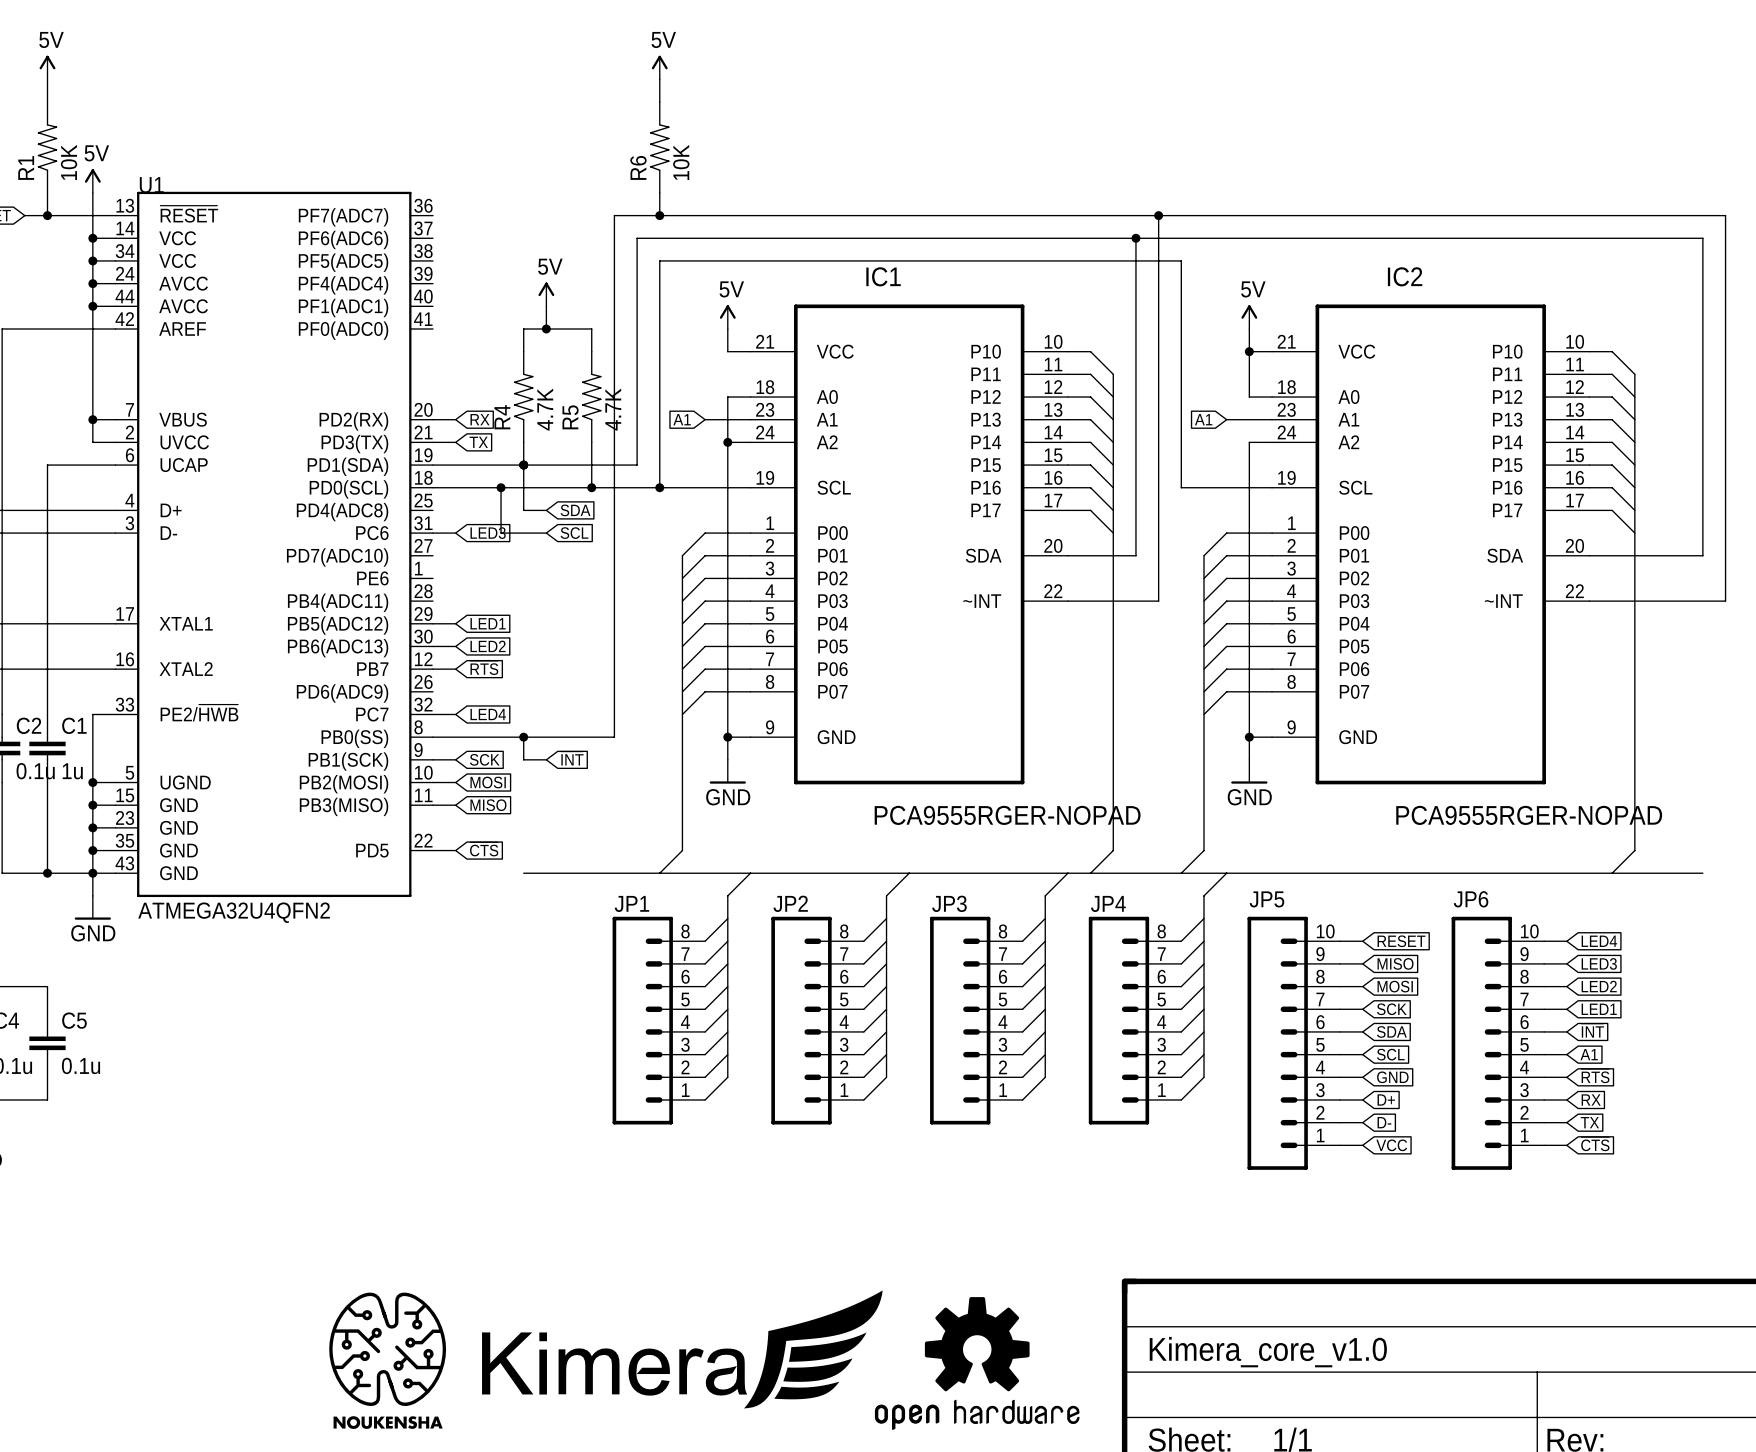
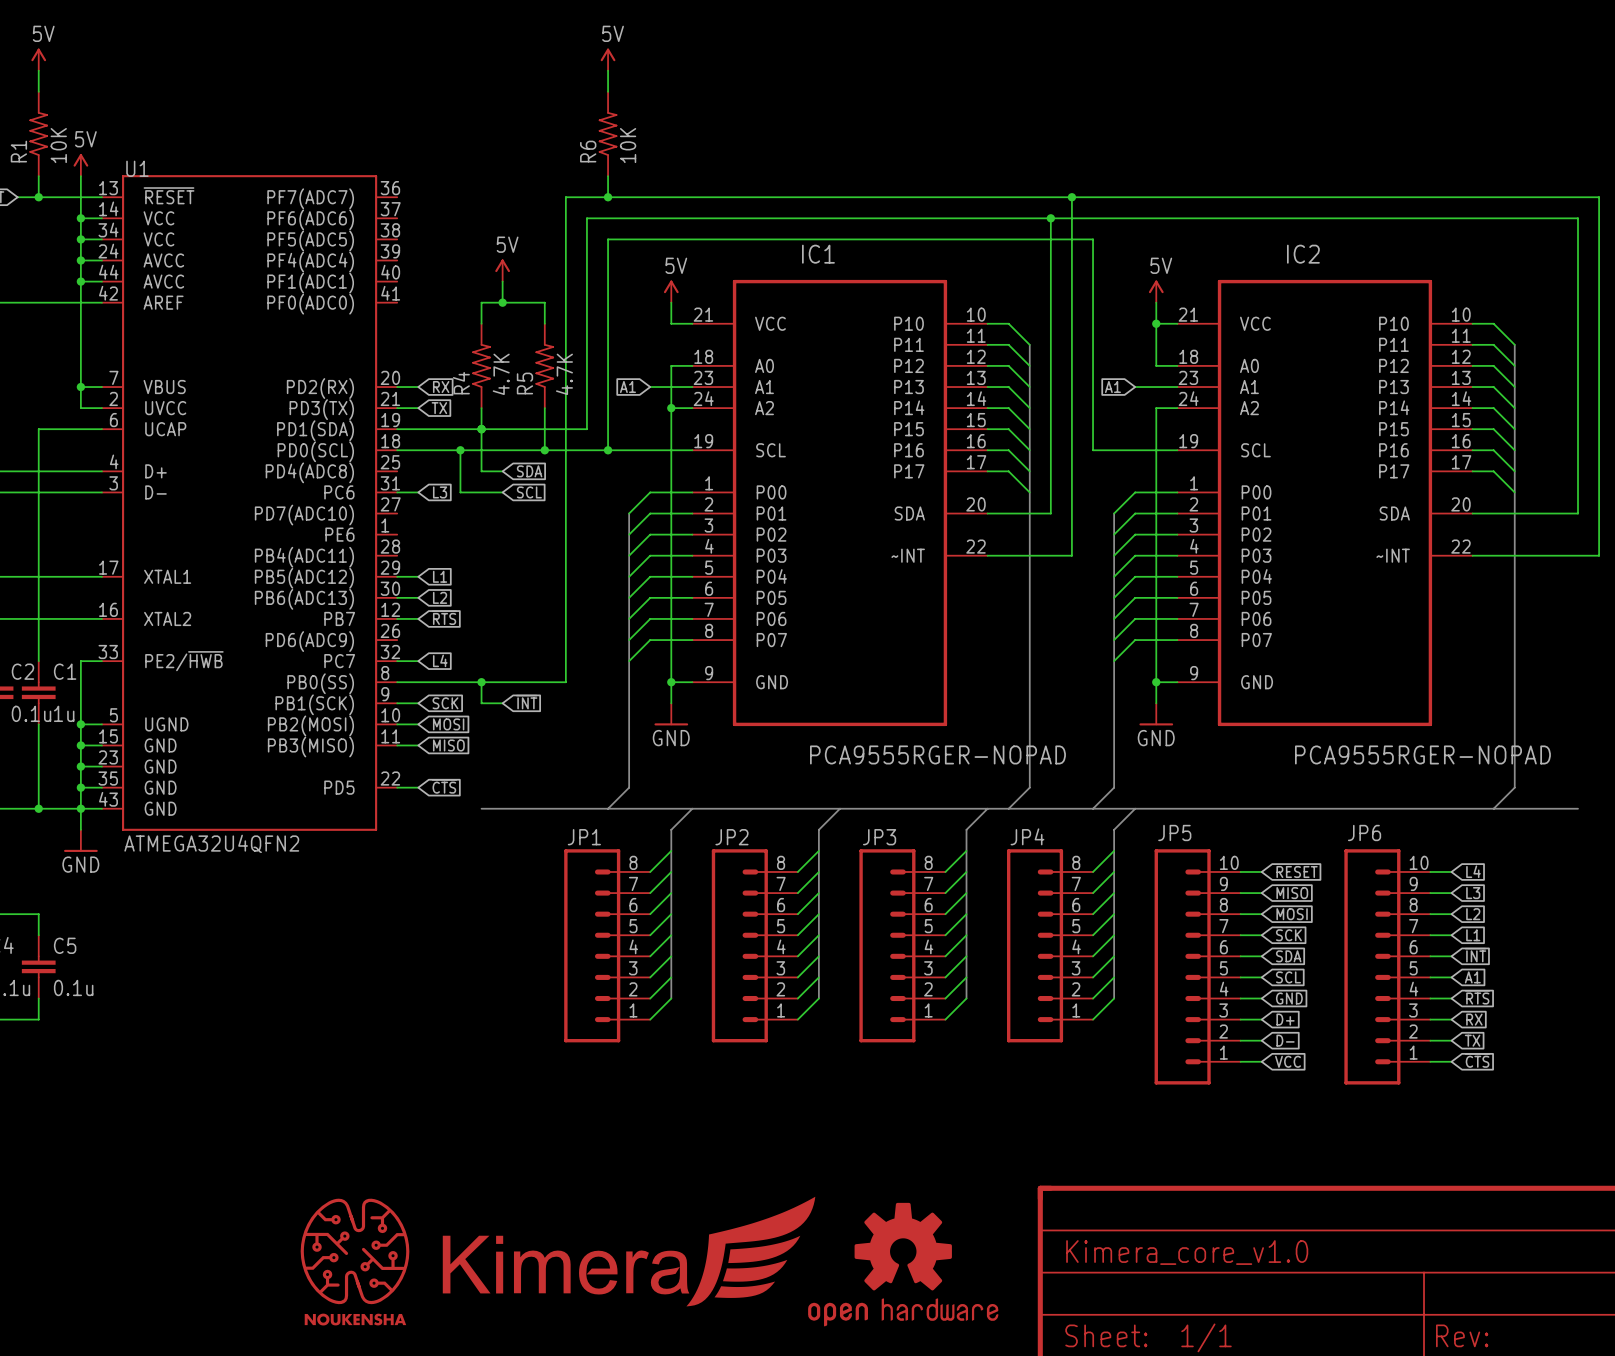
global label: LED3 (488, 533) -> L3 (440, 492)
global label: LED1 (488, 623) -> L1 (440, 576)
global label: LED2 (488, 646) -> L2 (440, 597)
global label: LED4 (488, 714) -> L4 (440, 660)
global label: LED4 (1599, 941) -> L4 (1473, 871)
global label: LED3 (1599, 963) -> L3 (1473, 893)
global label: LED2 (1599, 986) -> L2 (1473, 914)
global label: LED1 (1599, 1009) -> L1 (1473, 935)

